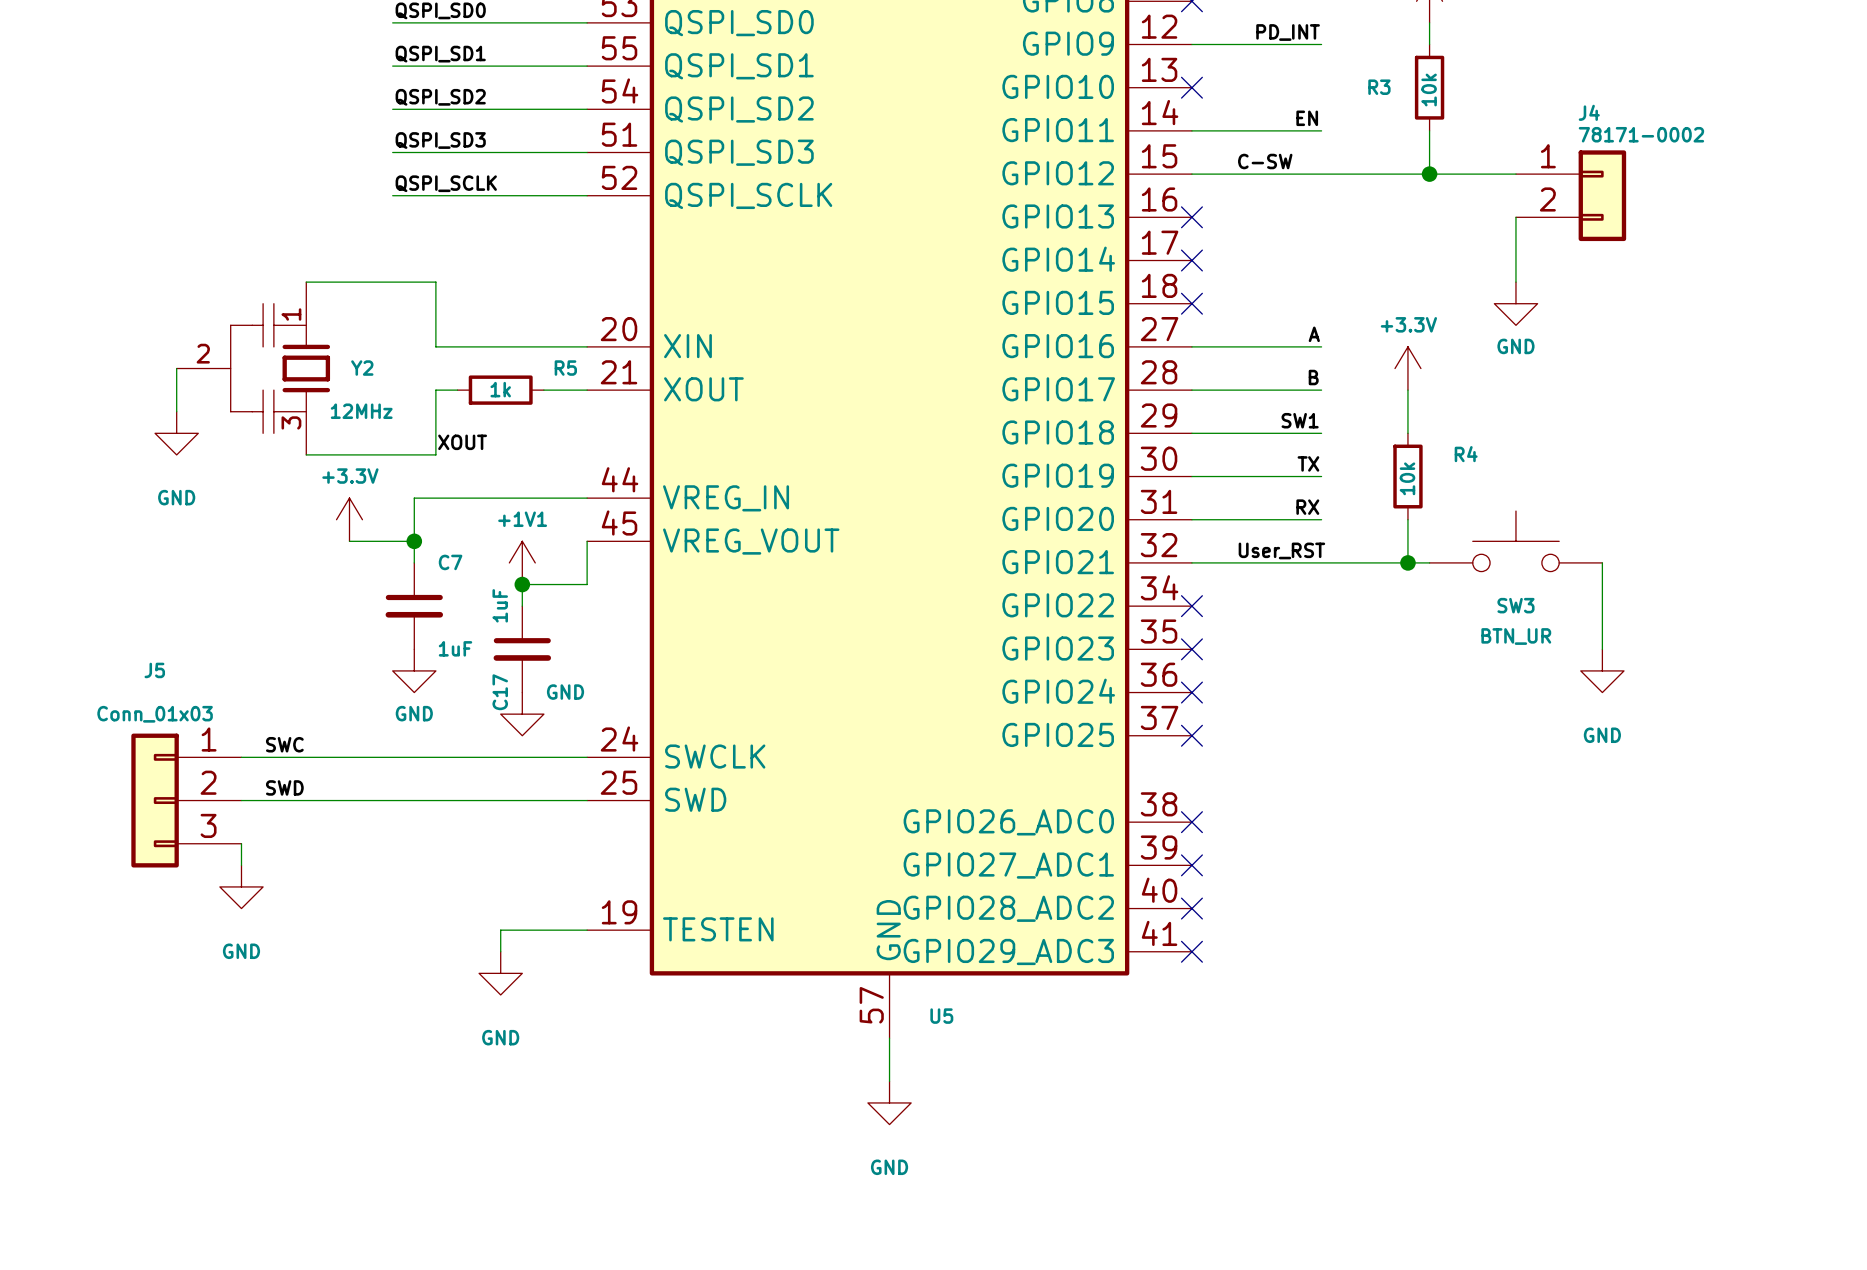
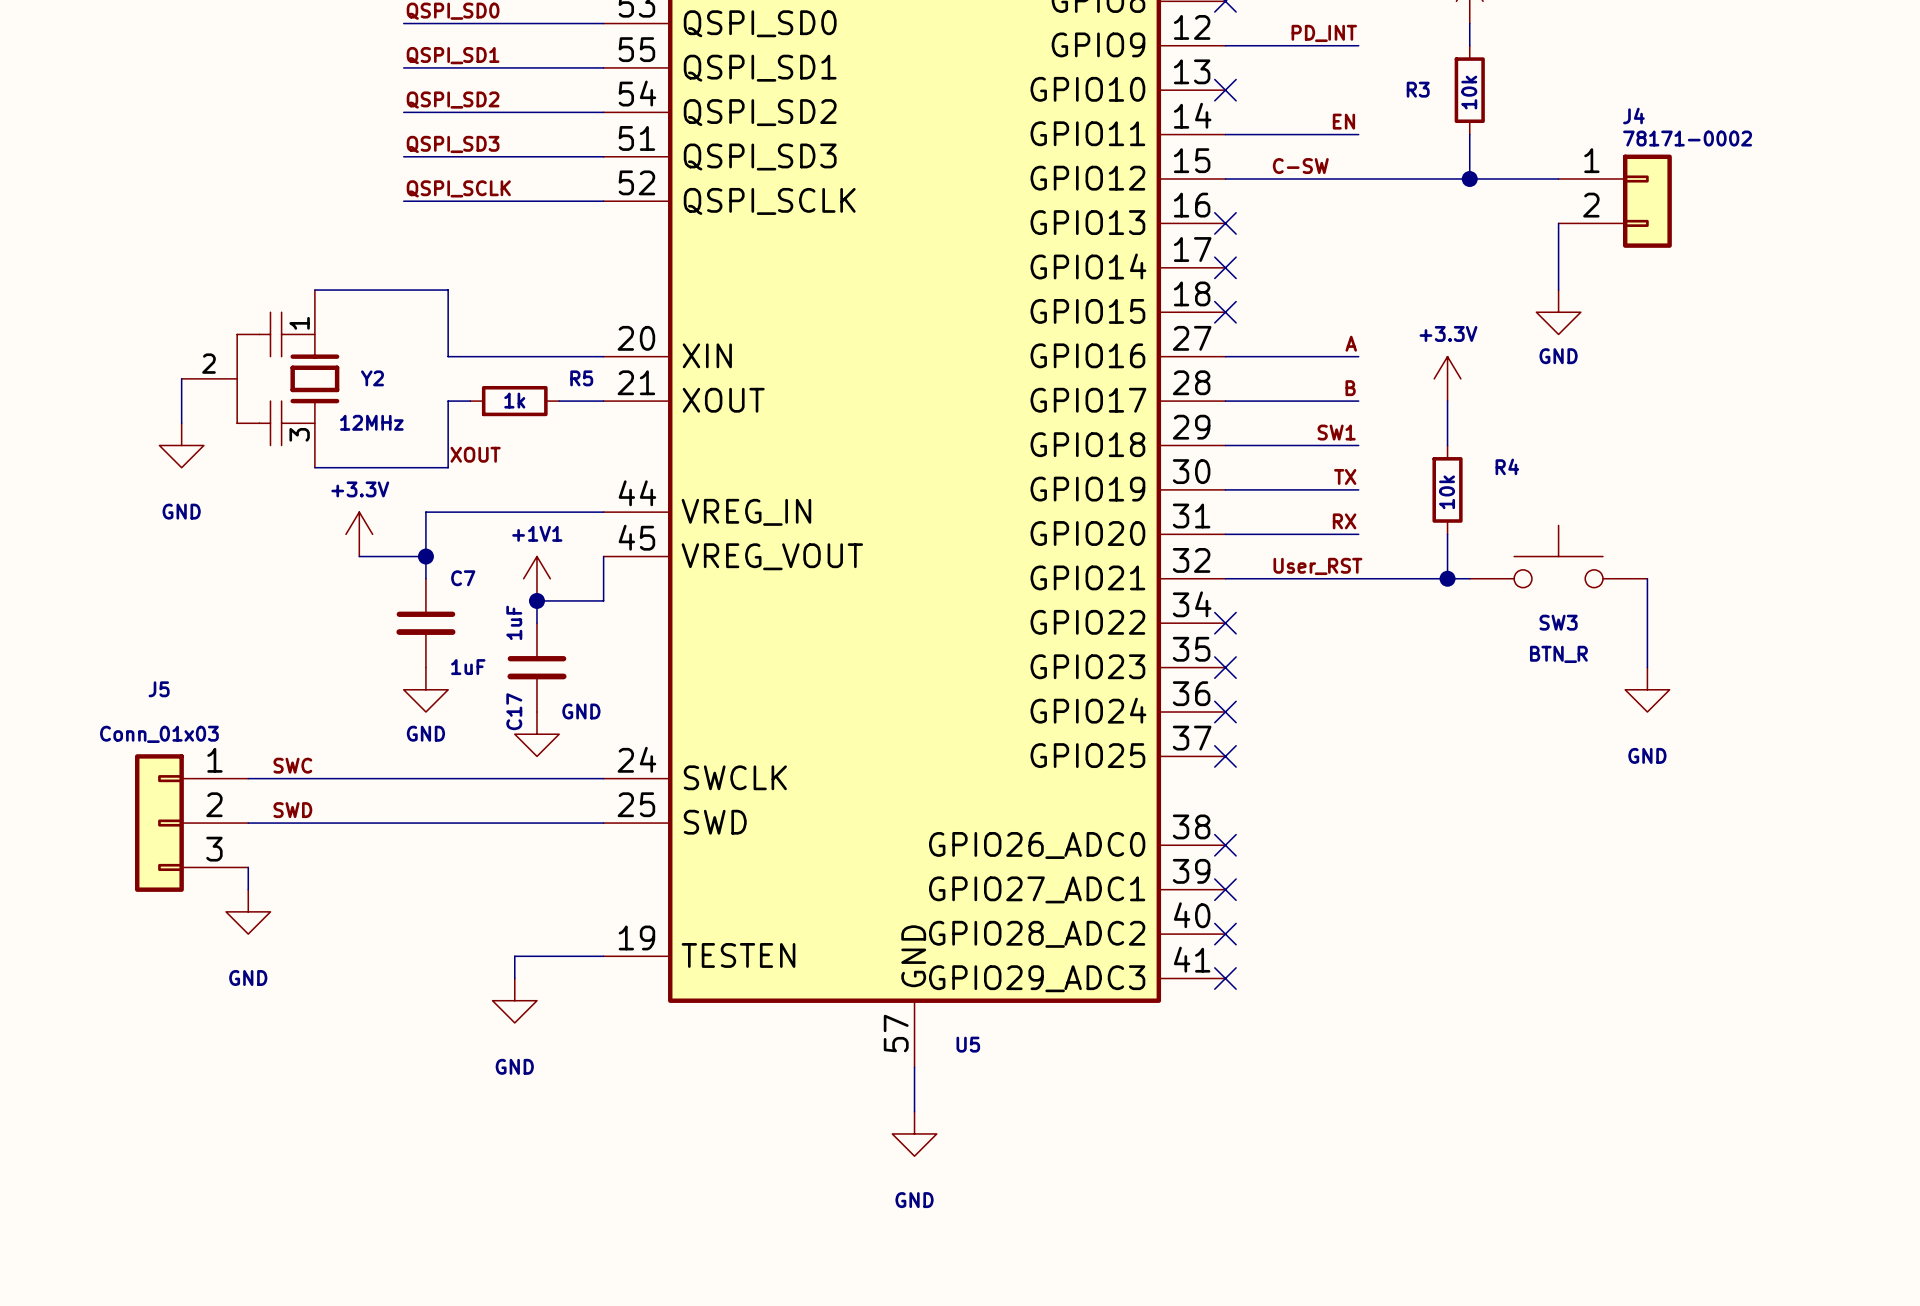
SW3 value: BTN_UR (1516, 636) -> BTN_R (1558, 654)

